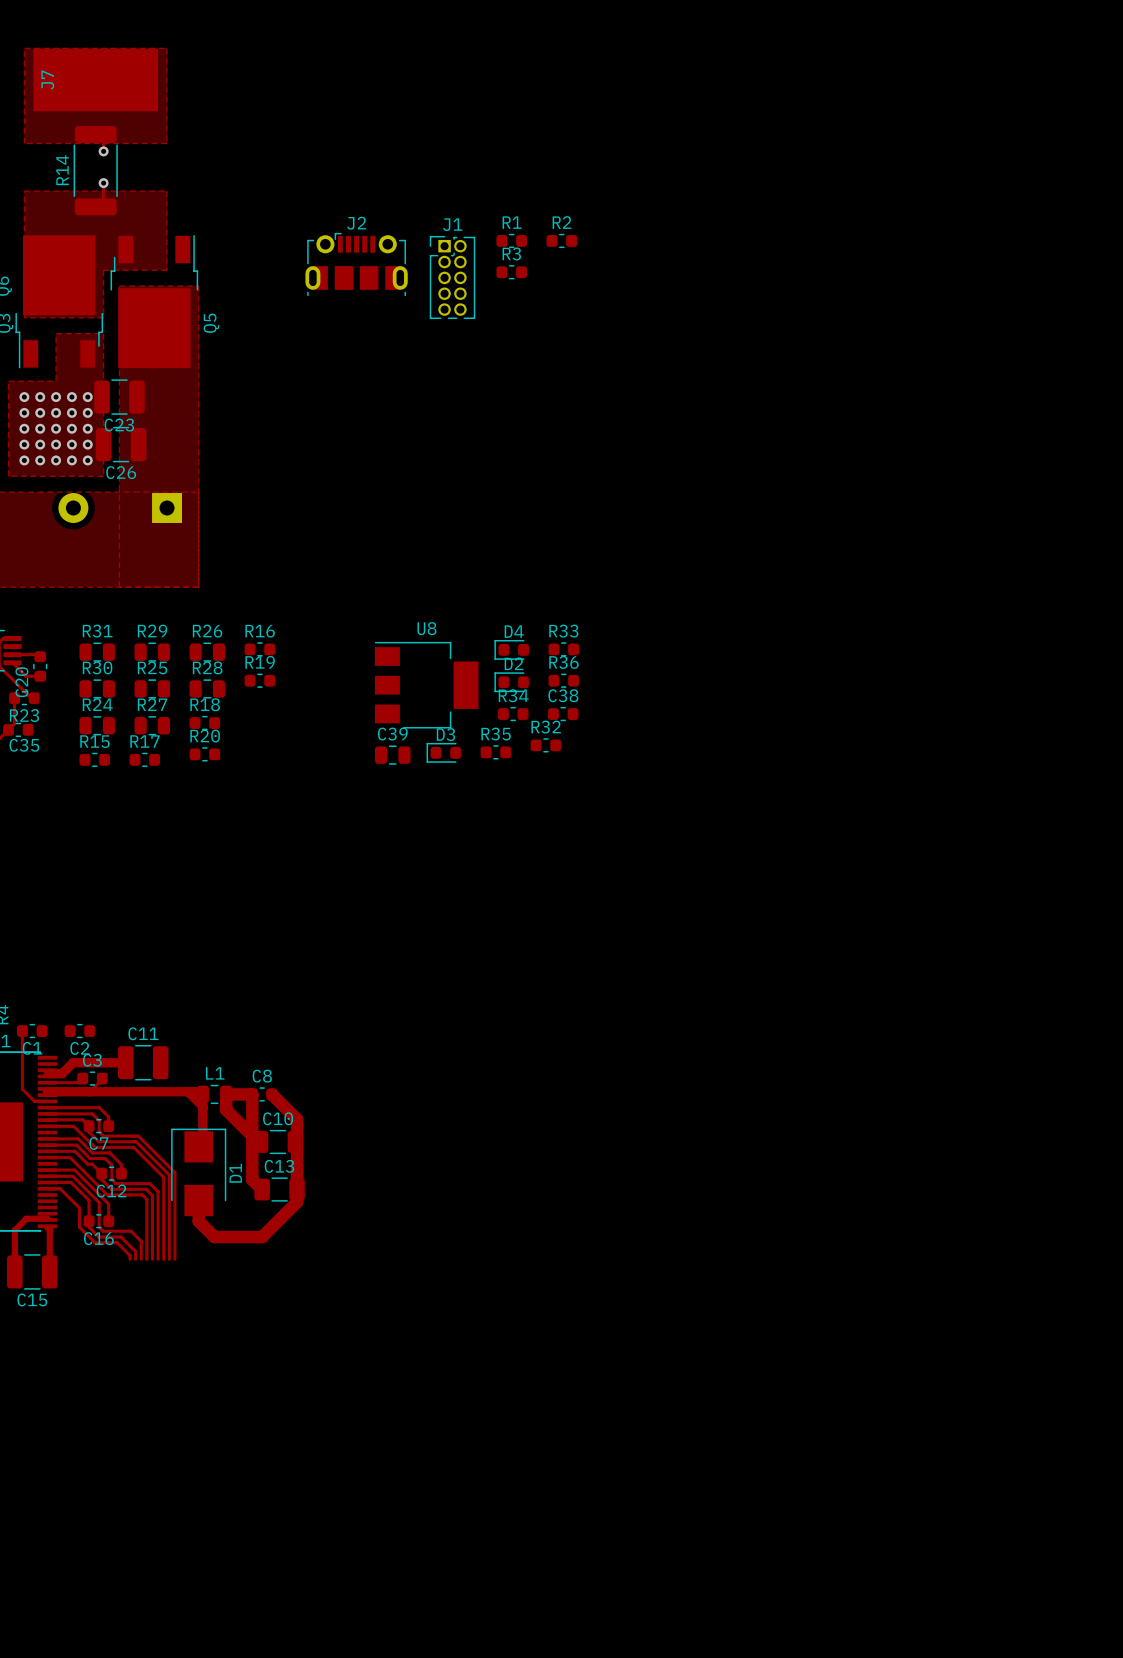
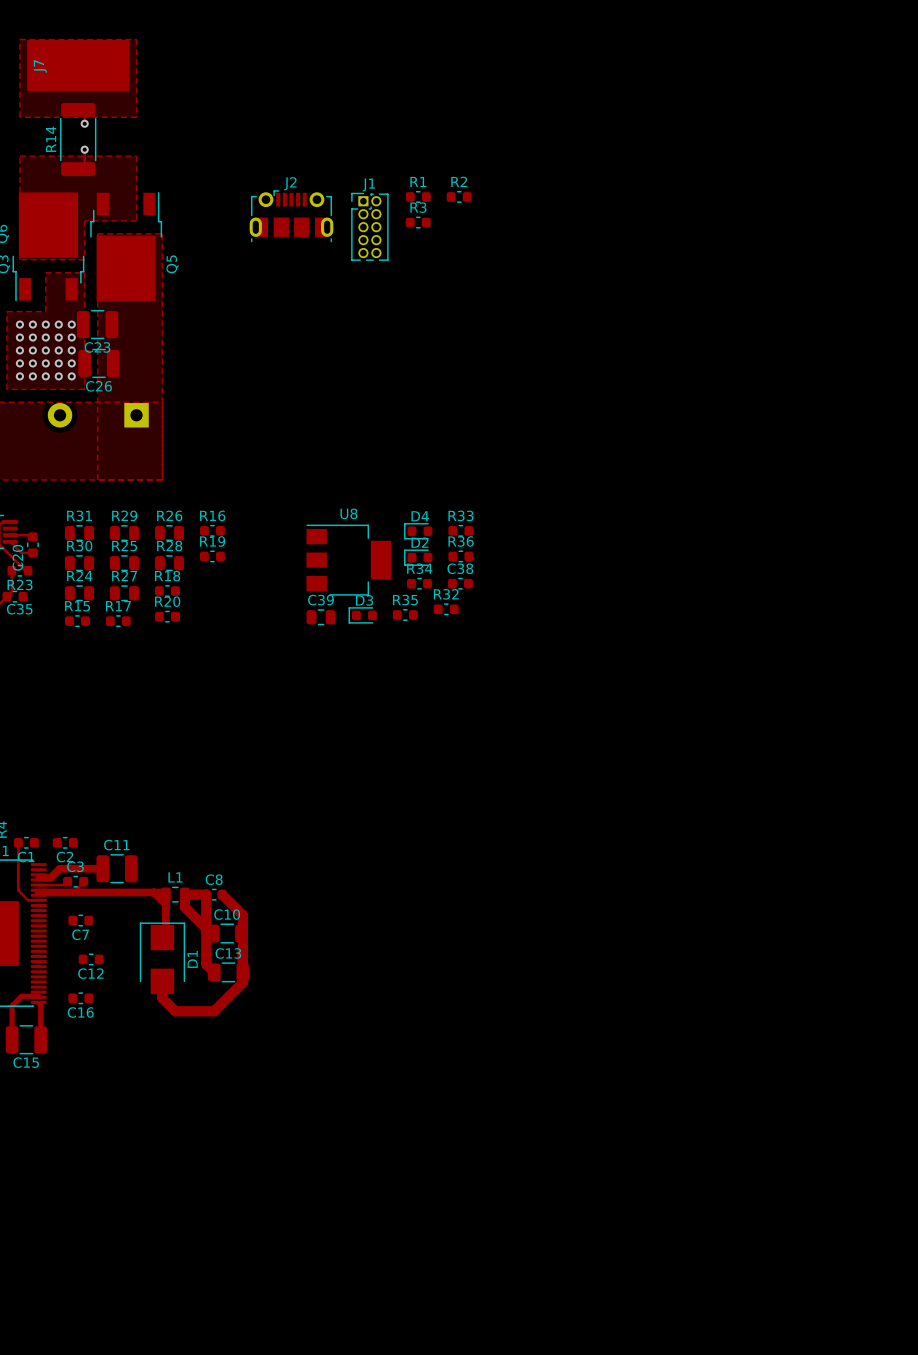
track: (47, 1107) (99, 1107) (108, 1116) (108, 1126) -> none
track: (47, 1113) (92, 1113) (99, 1120) (99, 1132) (103, 1136) (138, 1136) (174, 1172) (174, 1259) -> none
track: (47, 1120) (82, 1119) (89, 1126) (89, 1132) (98, 1141) (136, 1141) (169, 1175) (169, 1259) -> none
track: (47, 1126) (73, 1126) (94, 1147) (133, 1147) (163, 1177) (163, 1259) -> none
track: (47, 1138) (78, 1138) (92, 1152) (109, 1152) (121, 1164) (121, 1173) -> none
track: (47, 1145) (76, 1145) (90, 1158) (105, 1158) (111, 1165) (111, 1179) (115, 1183) (150, 1183) (158, 1191) (158, 1259) -> none
track: (47, 1151) (74, 1151) (87, 1164) (92, 1164) (101, 1173) (101, 1179) (111, 1189) (146, 1189) (152, 1195) (152, 1259) -> none
track: (47, 1157) (70, 1157) (107, 1194) (142, 1194) (146, 1199) (146, 1259) -> none
track: (47, 1170) (74, 1170) (108, 1204) (108, 1221) -> none
track: (47, 1176) (72, 1176) (99, 1202) (99, 1227) (103, 1231) (131, 1231) (141, 1241) (141, 1259) -> none
track: (47, 1182) (71, 1182) (89, 1200) (89, 1227) (98, 1237) (121, 1237) (135, 1251) (135, 1259) -> none
track: (47, 1188) (60, 1188) (79, 1208) (79, 1227) (94, 1242) (117, 1242) (130, 1255) (130, 1259) -> none

